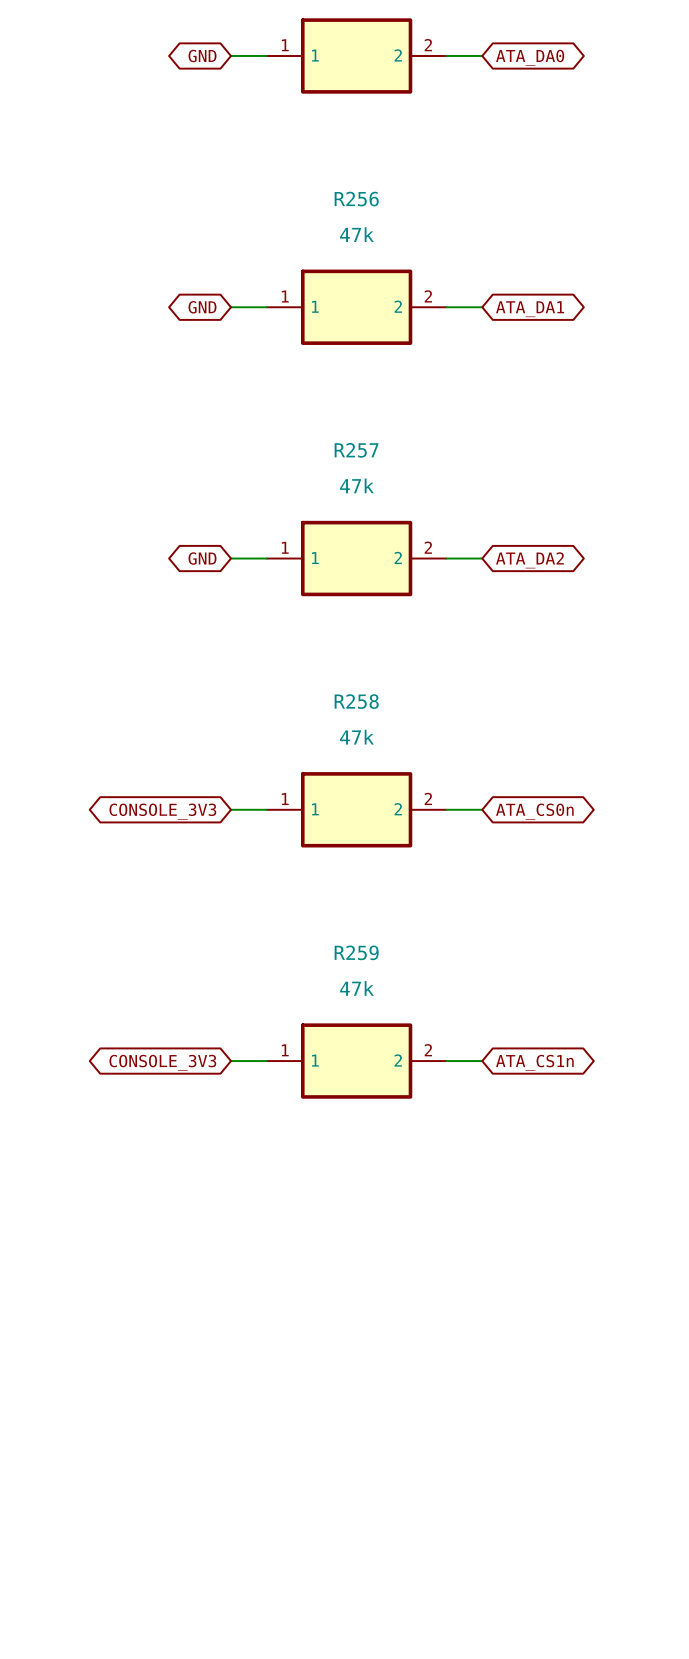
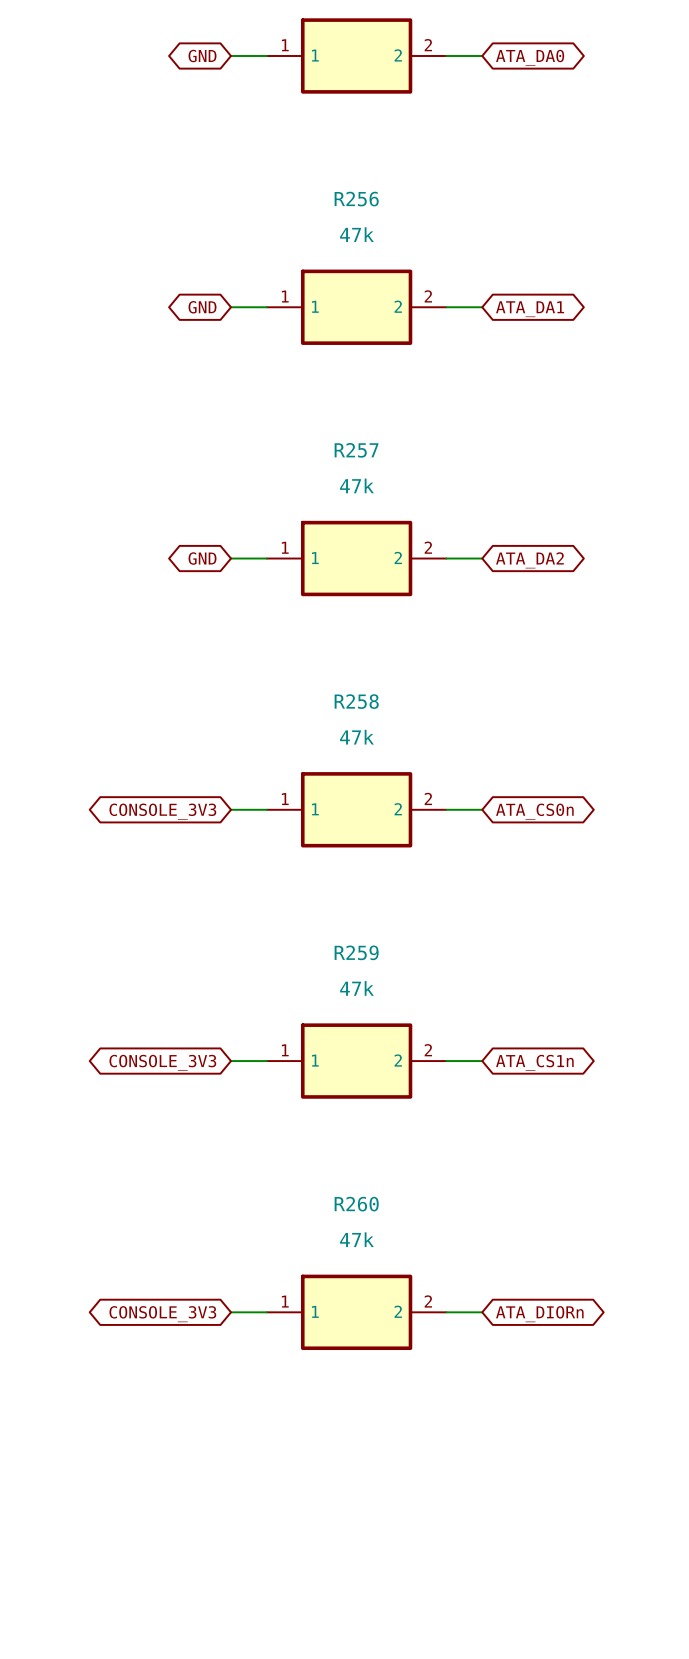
wire: none -> (230, 1312) (266, 1312)
R260: none -> 47k (356, 1312)
wire: none -> (446, 1312) (482, 1312)
global label: none -> CONSOLE_3V3 (162, 1314)
global label: none -> ATA_DIORn (539, 1314)

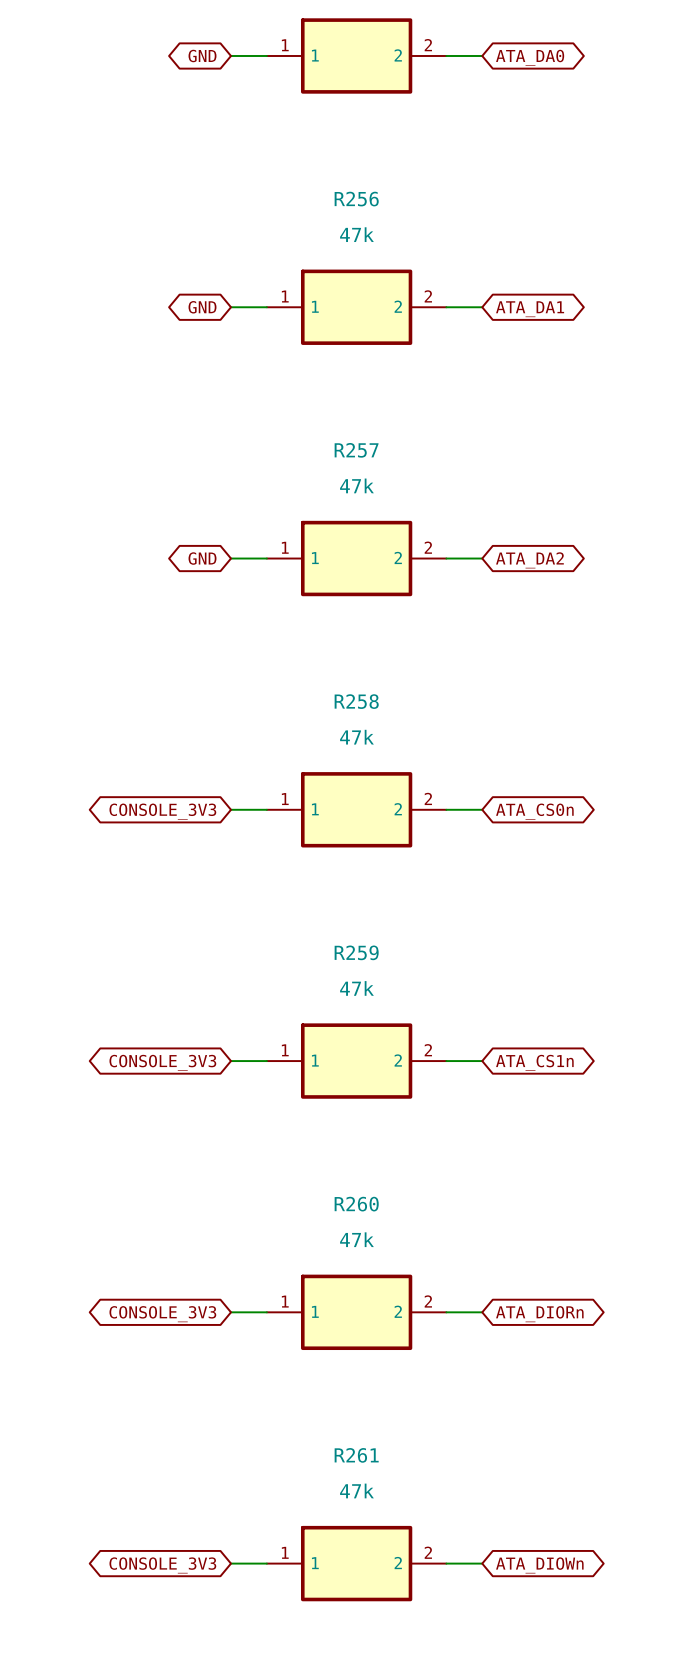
wire: none -> (230, 1563) (266, 1563)
R261: none -> 47k (356, 1563)
wire: none -> (446, 1563) (482, 1563)
global label: none -> CONSOLE_3V3 (162, 1565)
global label: none -> ATA_DIOWn (539, 1565)

